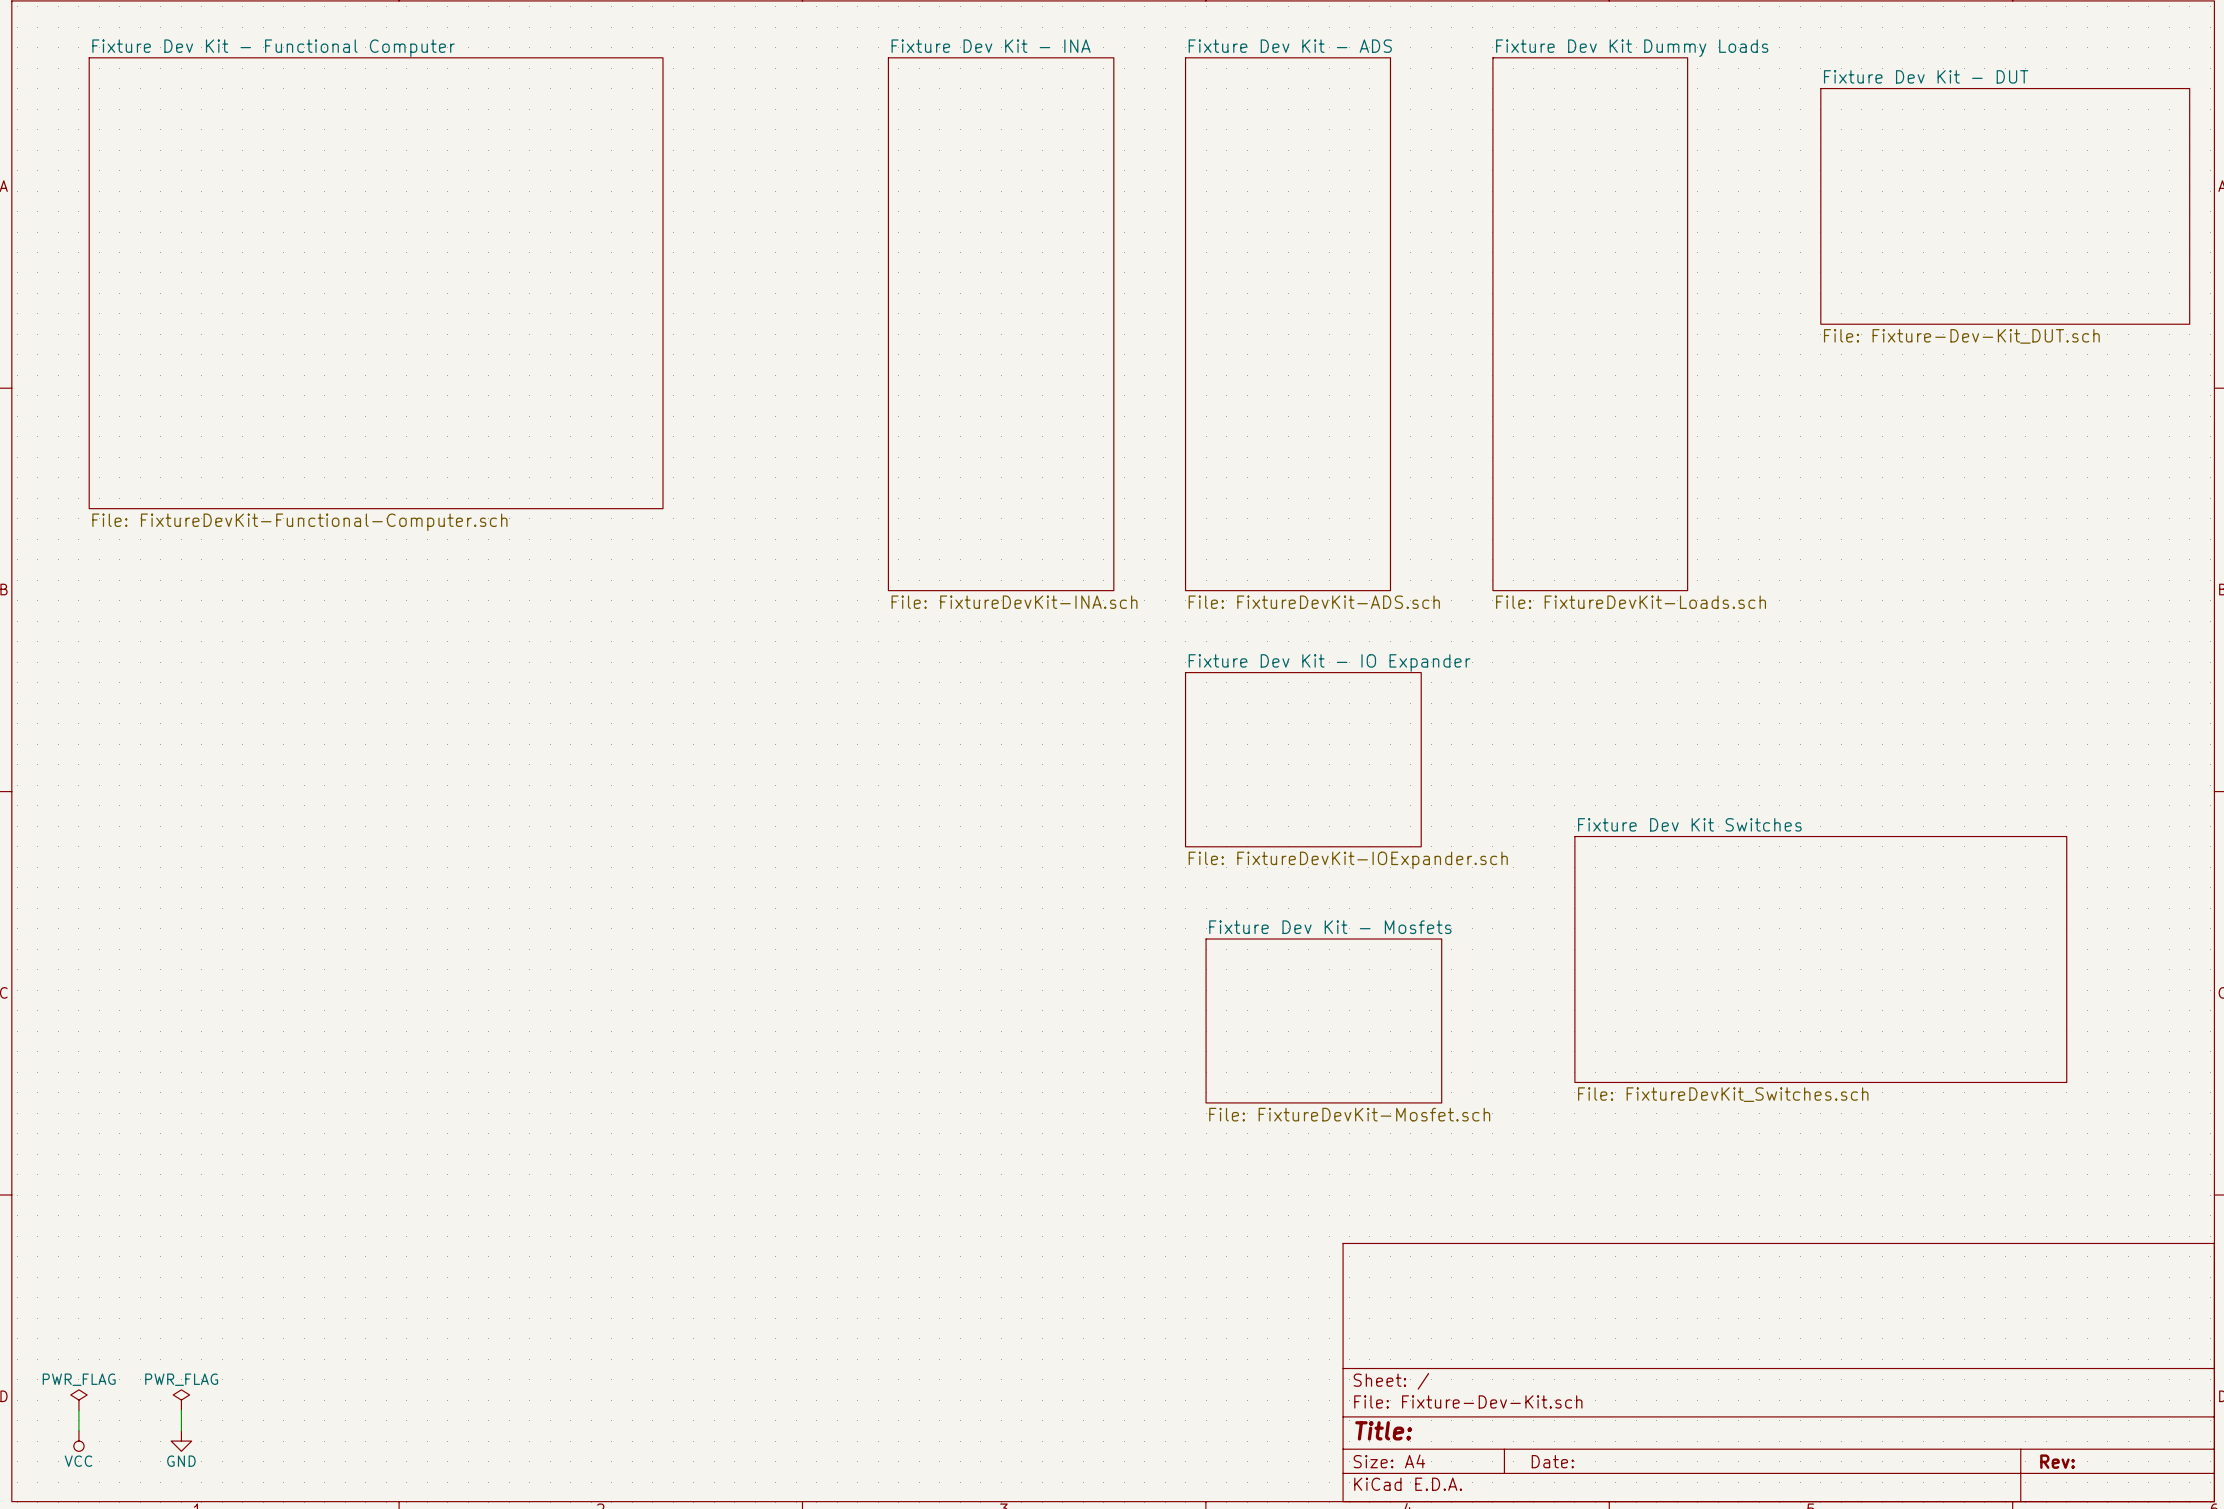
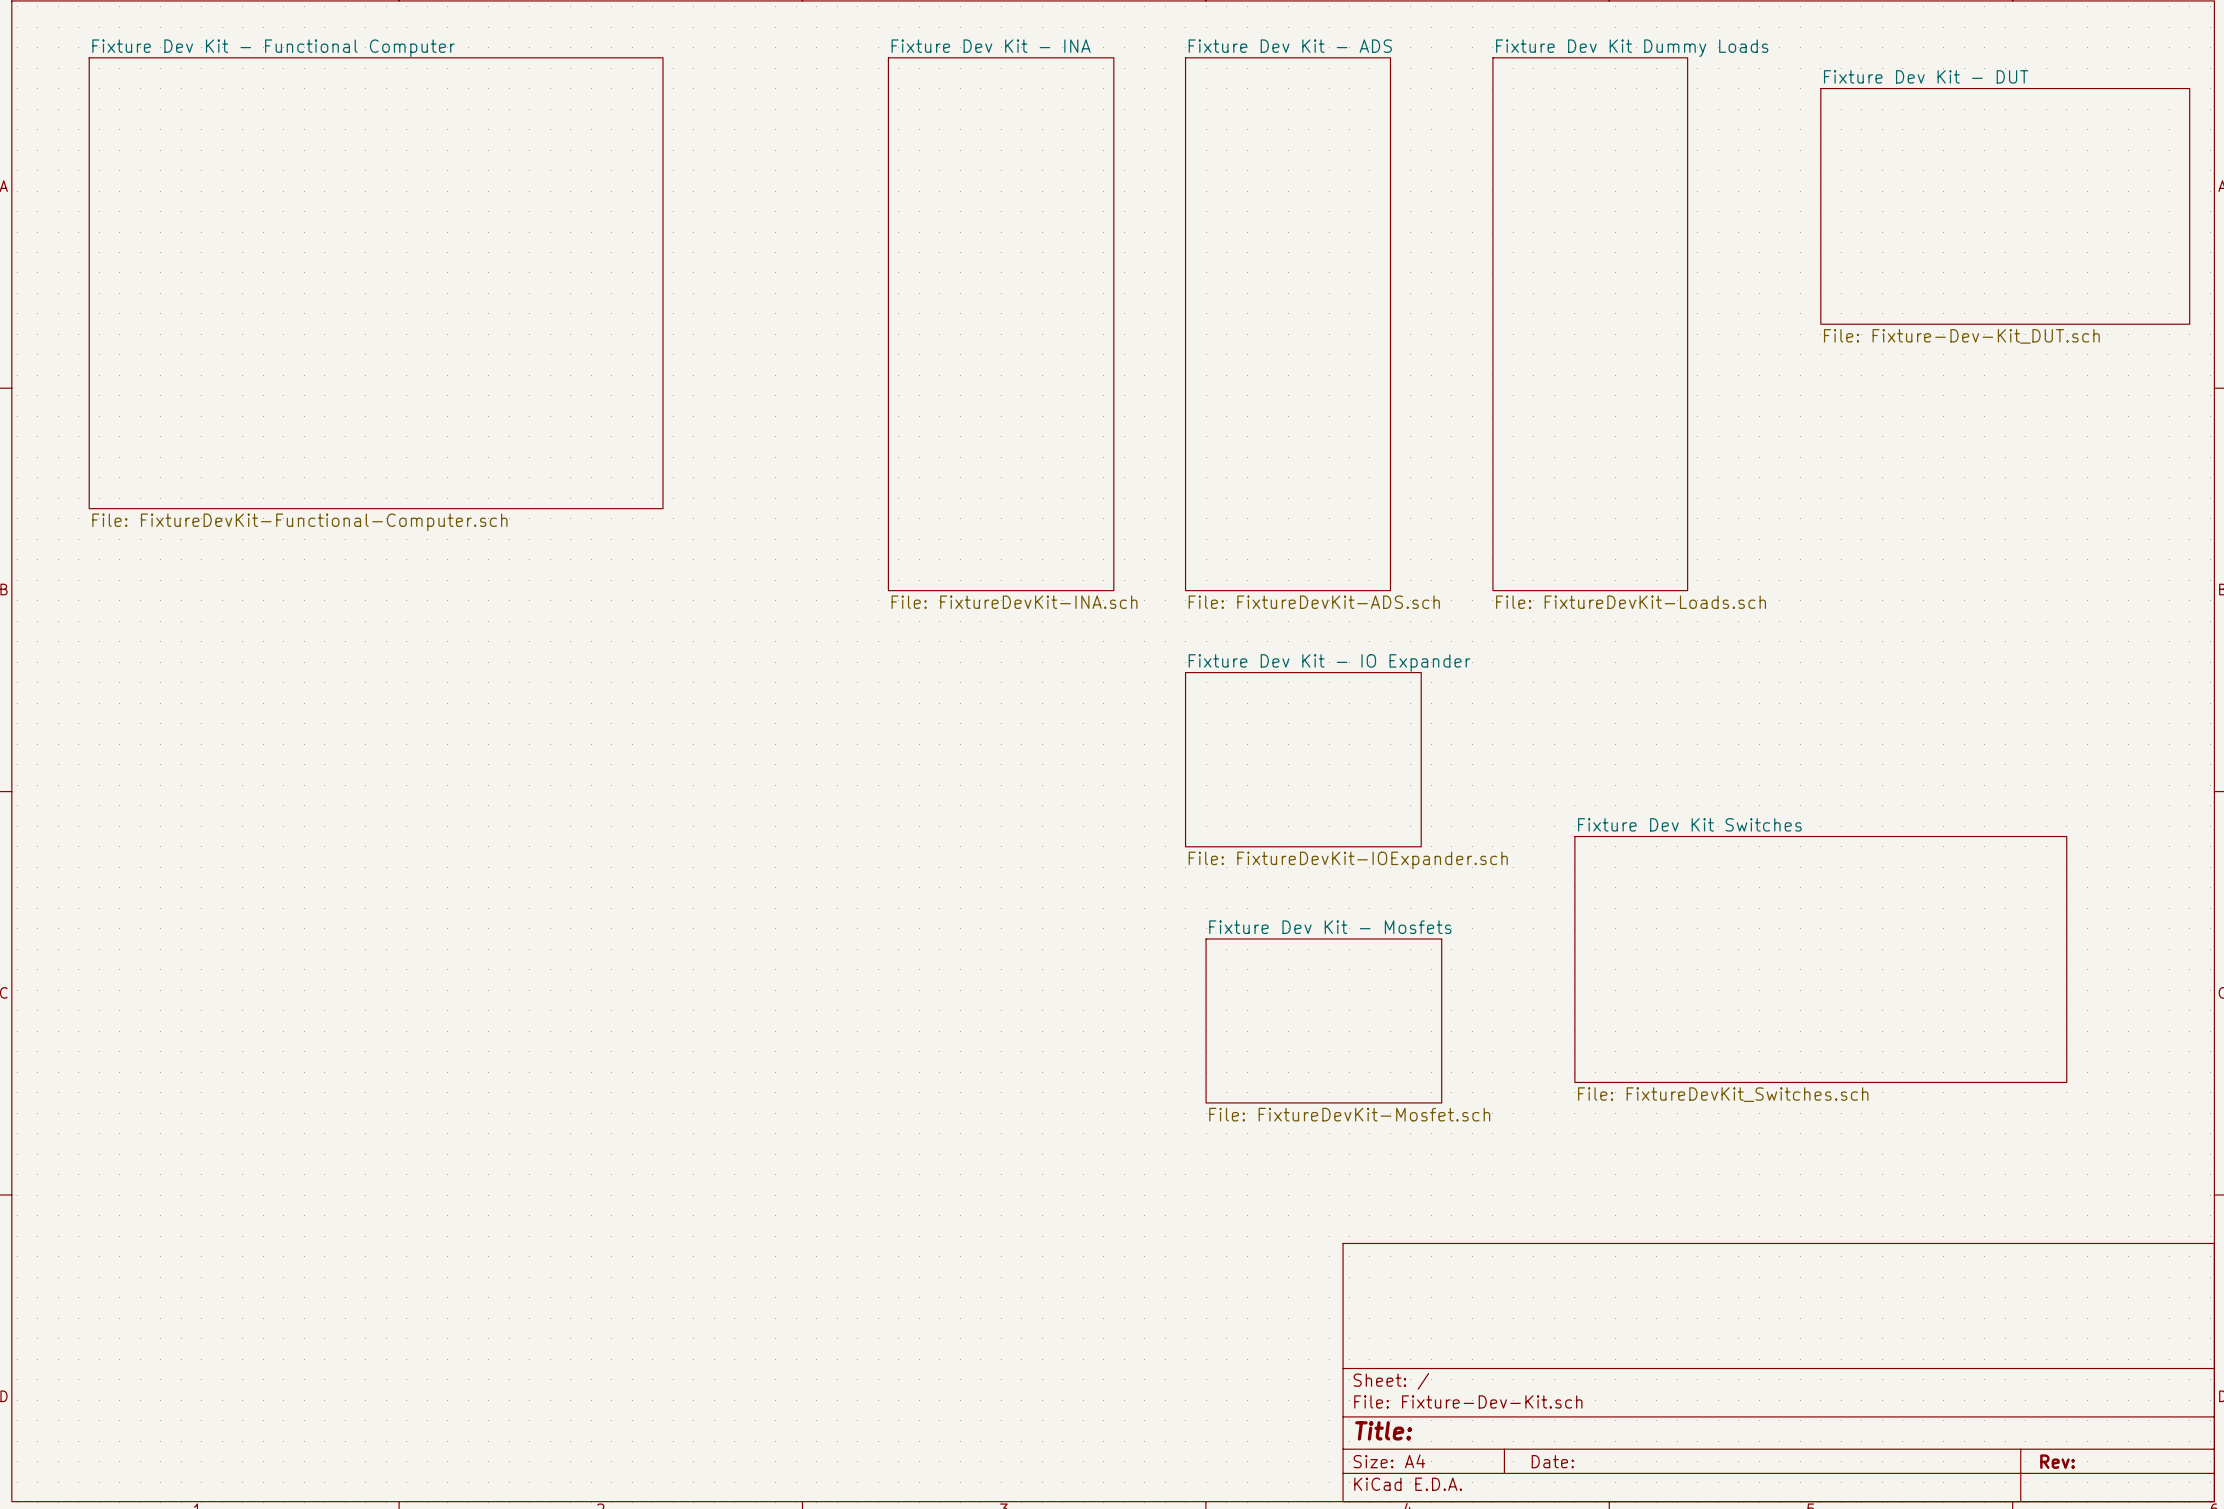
power symbol: PWR_FLAG (78, 1400) -> none
power symbol: PWR_FLAG (181, 1400) -> none
wire: (78, 1410) (78, 1430) -> none
wire: (181, 1410) (181, 1430) -> none
power symbol: VCC (78, 1441) -> none
power symbol: GND (181, 1441) -> none

